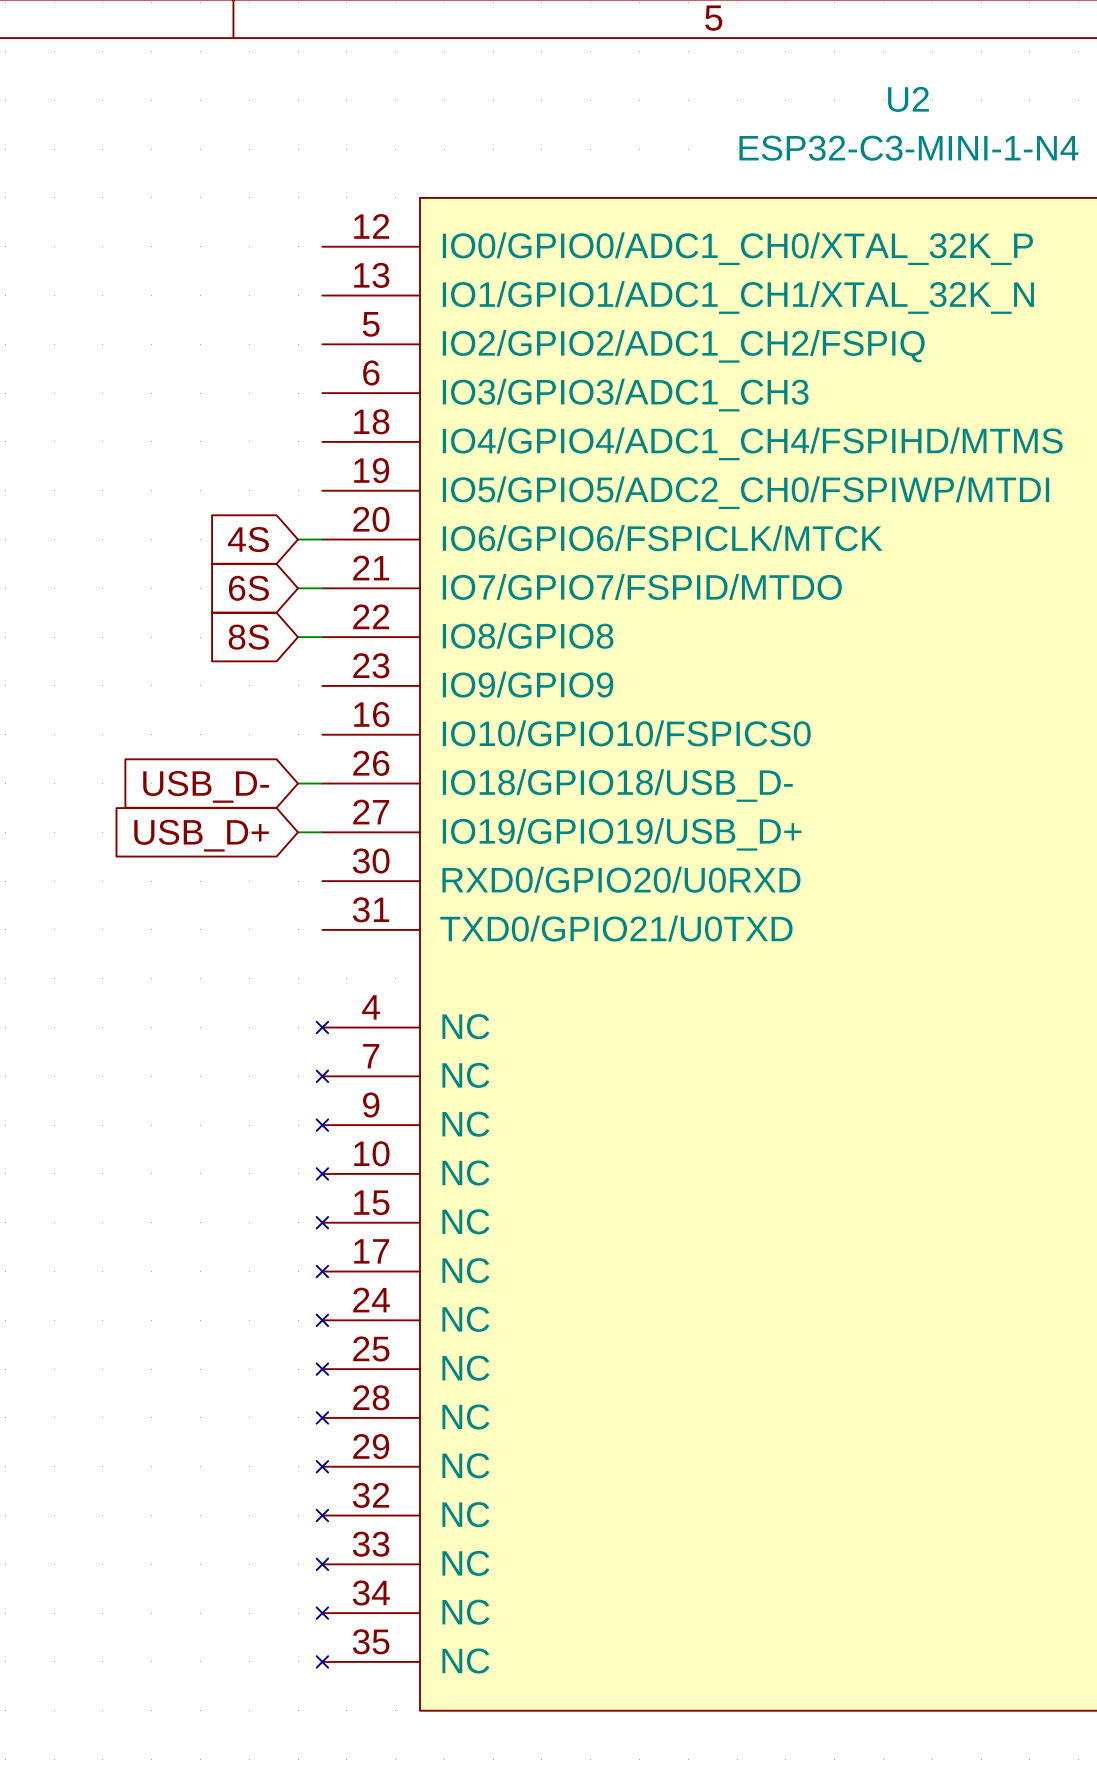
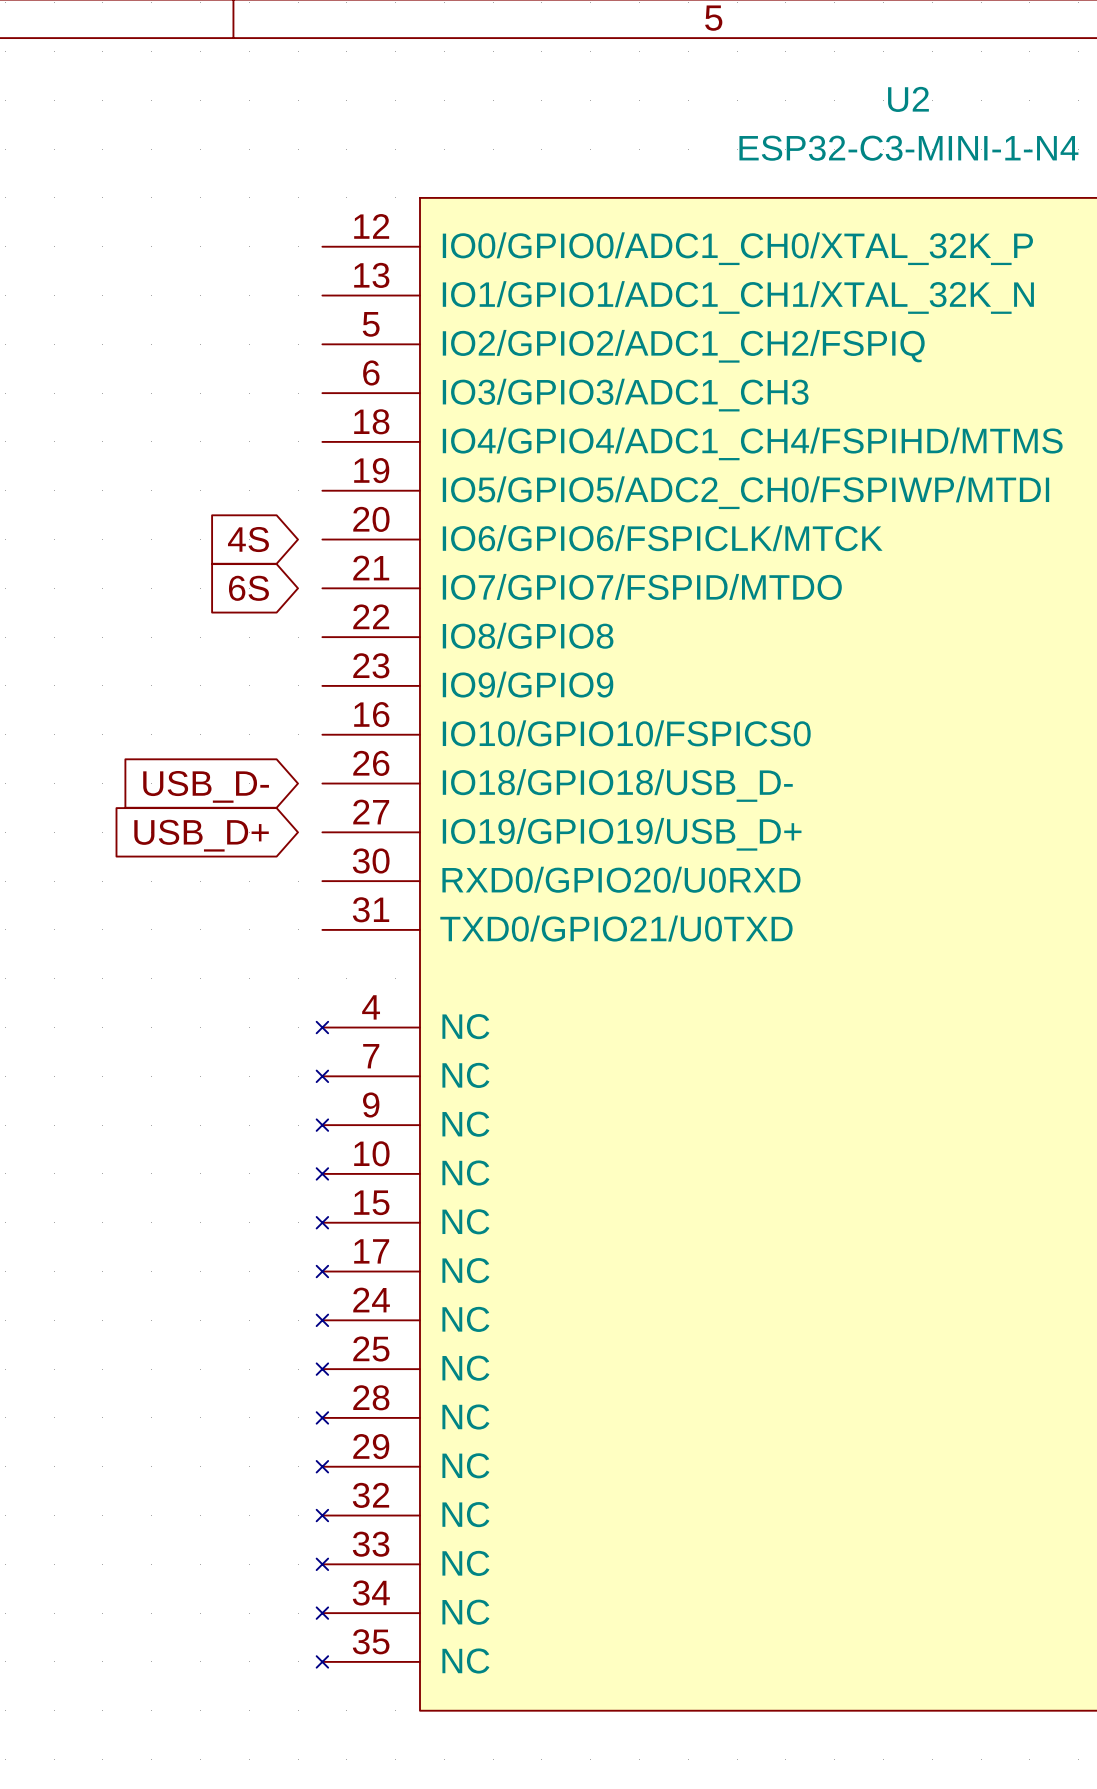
wire: (298, 539) (322, 539) -> none
wire: (298, 588) (322, 588) -> none
global label: 8S (248, 637) -> none
wire: (298, 637) (322, 637) -> none
wire: (298, 783) (322, 783) -> none
wire: (298, 832) (322, 832) -> none

